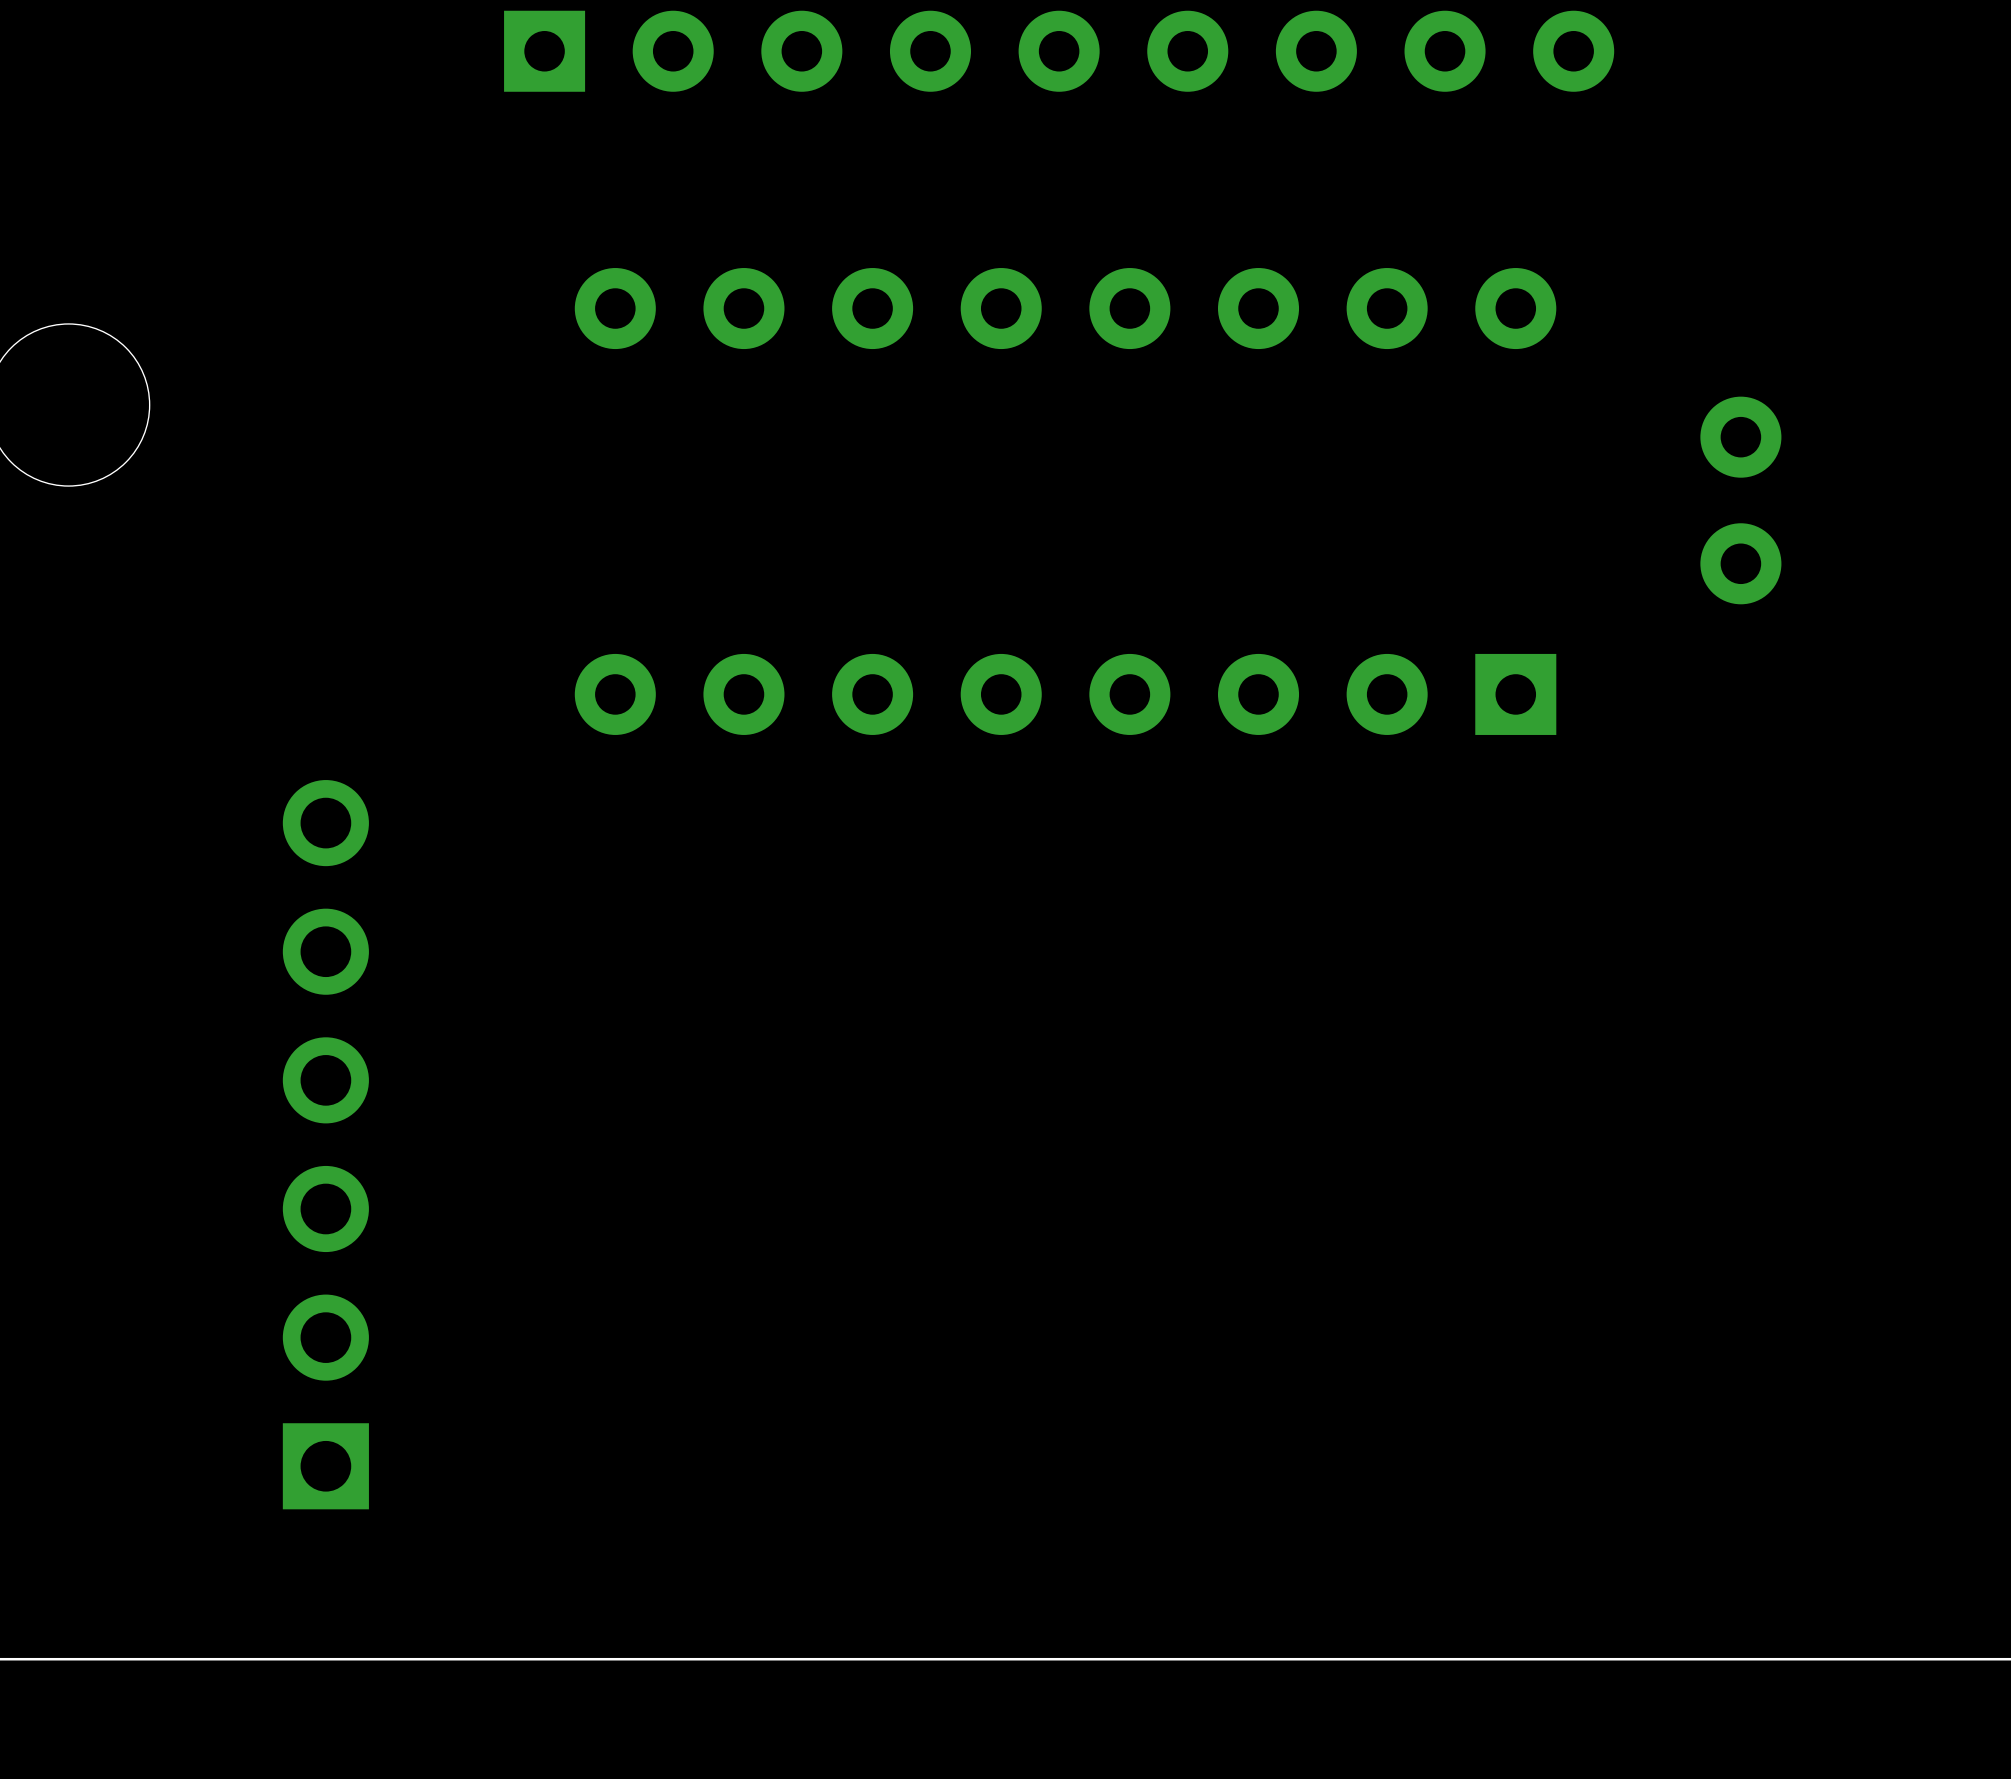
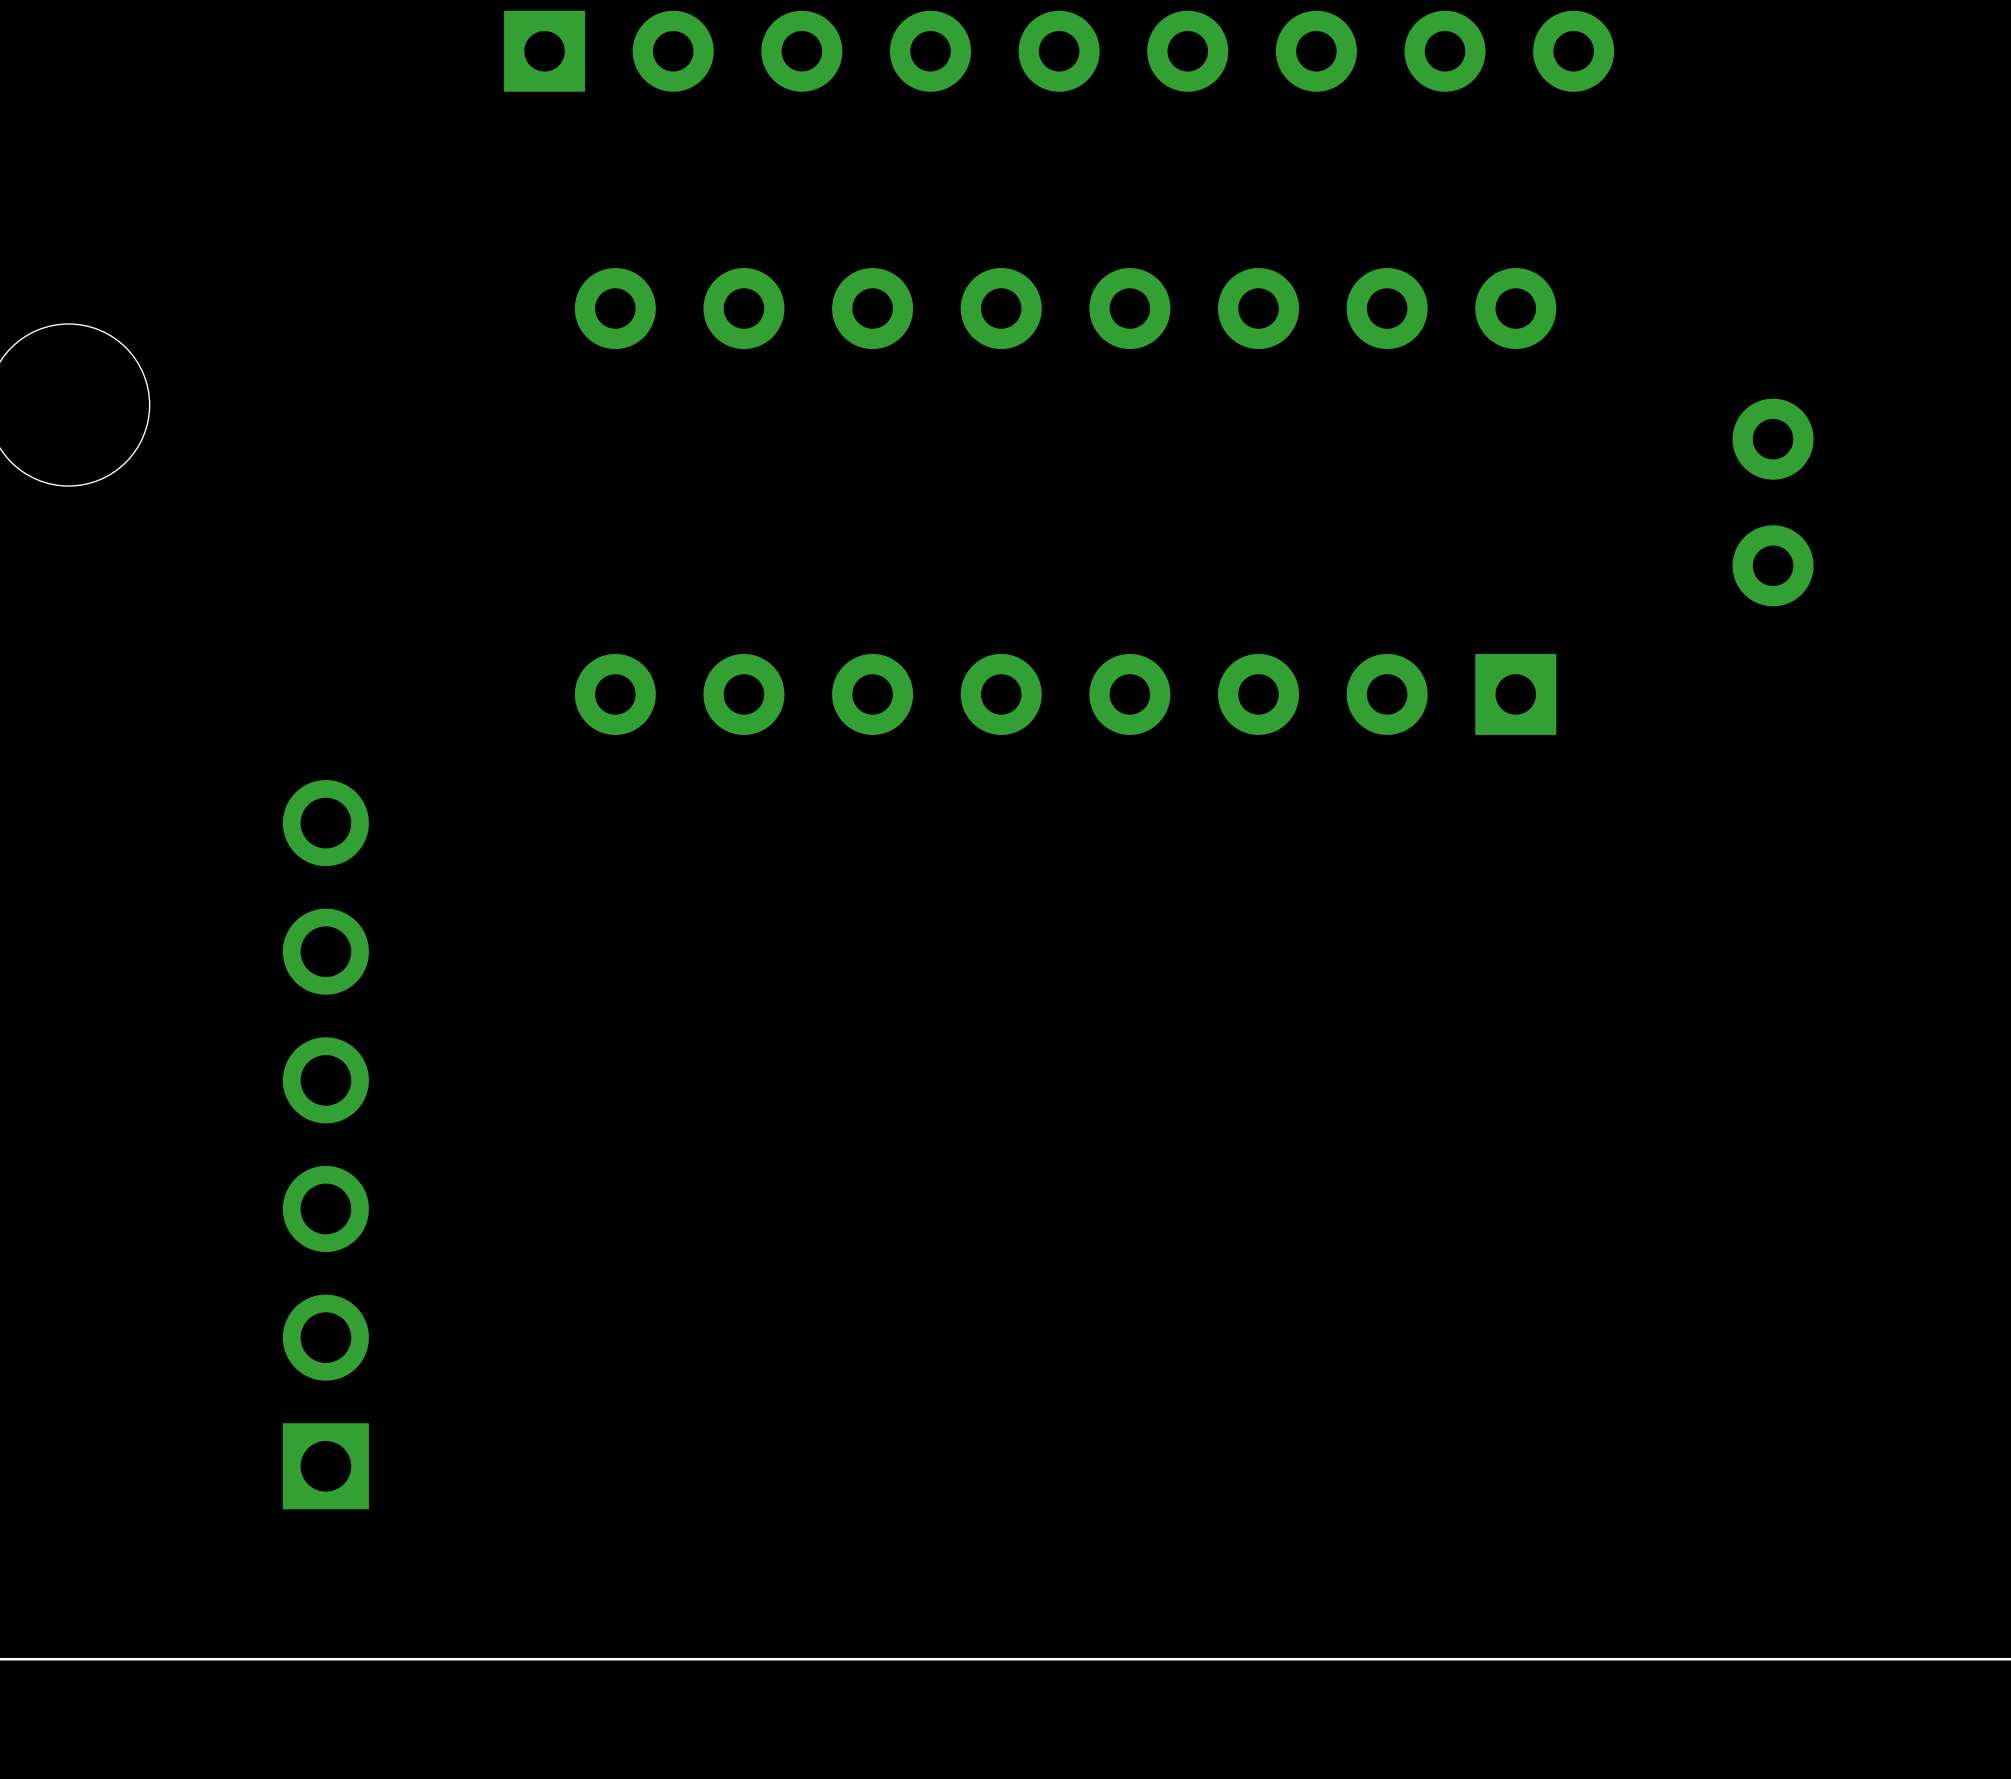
part position: (1740, 500) -> (1773, 502)

